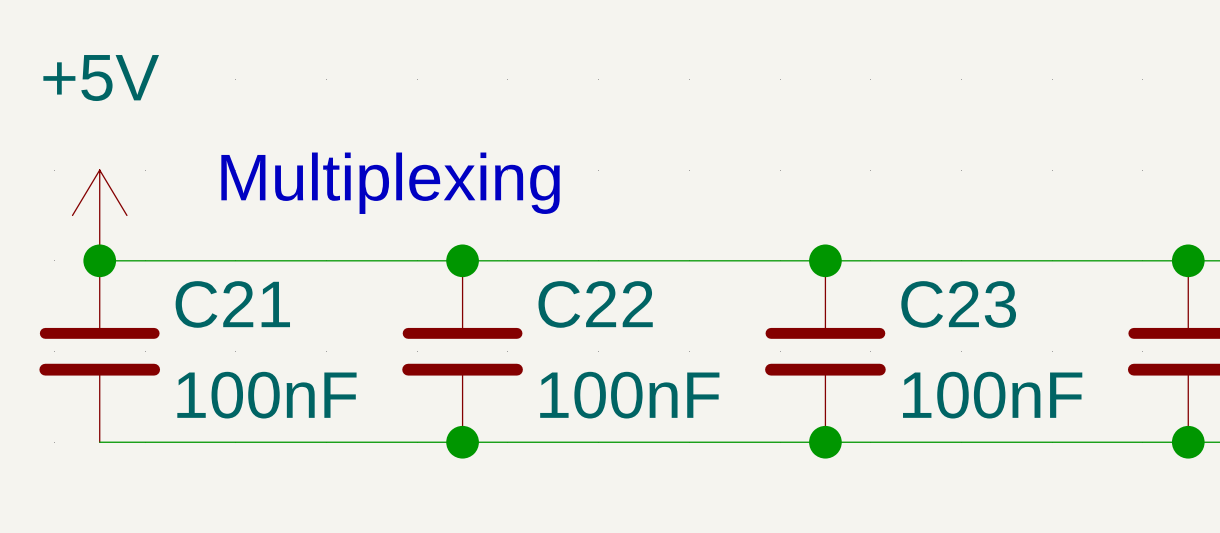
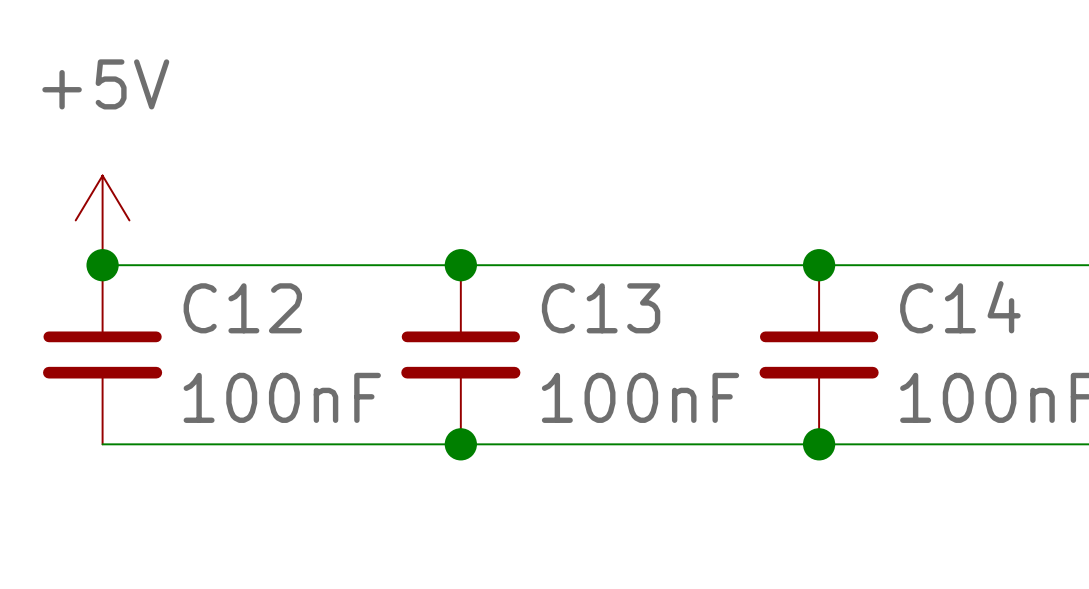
text: Multiplexing (390, 183) -> none
C21 name: C21 (232, 304) -> C12 (242, 308)
C22 name: C22 (595, 304) -> C13 (601, 308)
C23 name: C23 (958, 304) -> C14 (960, 307)

